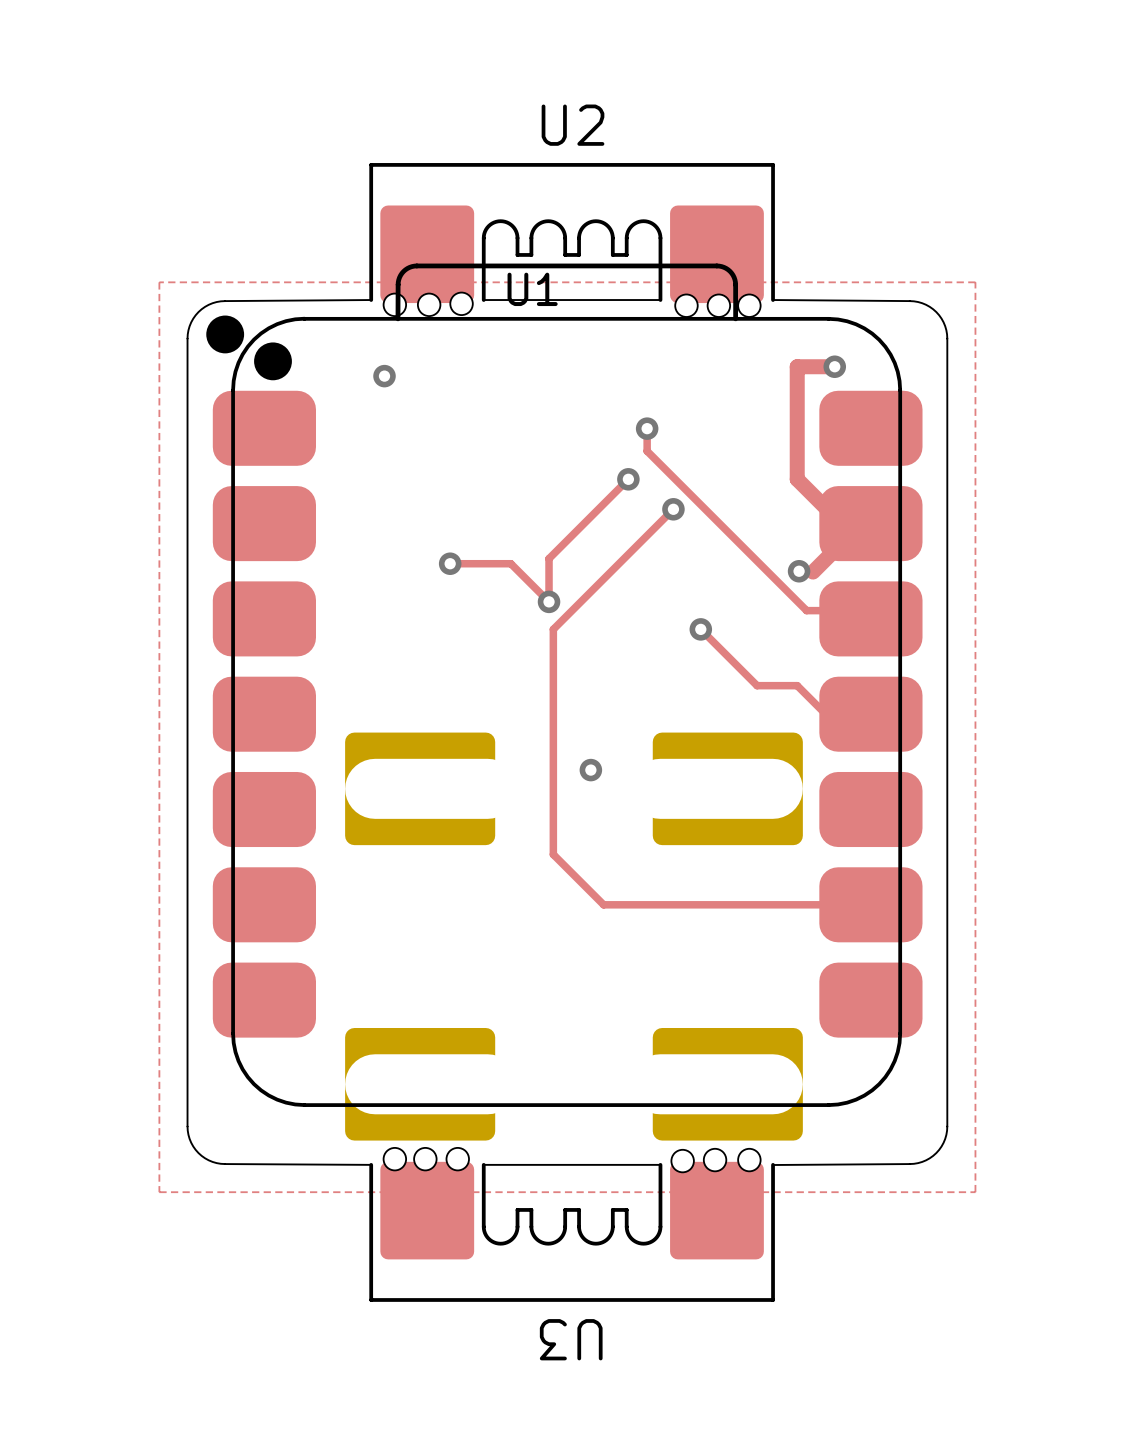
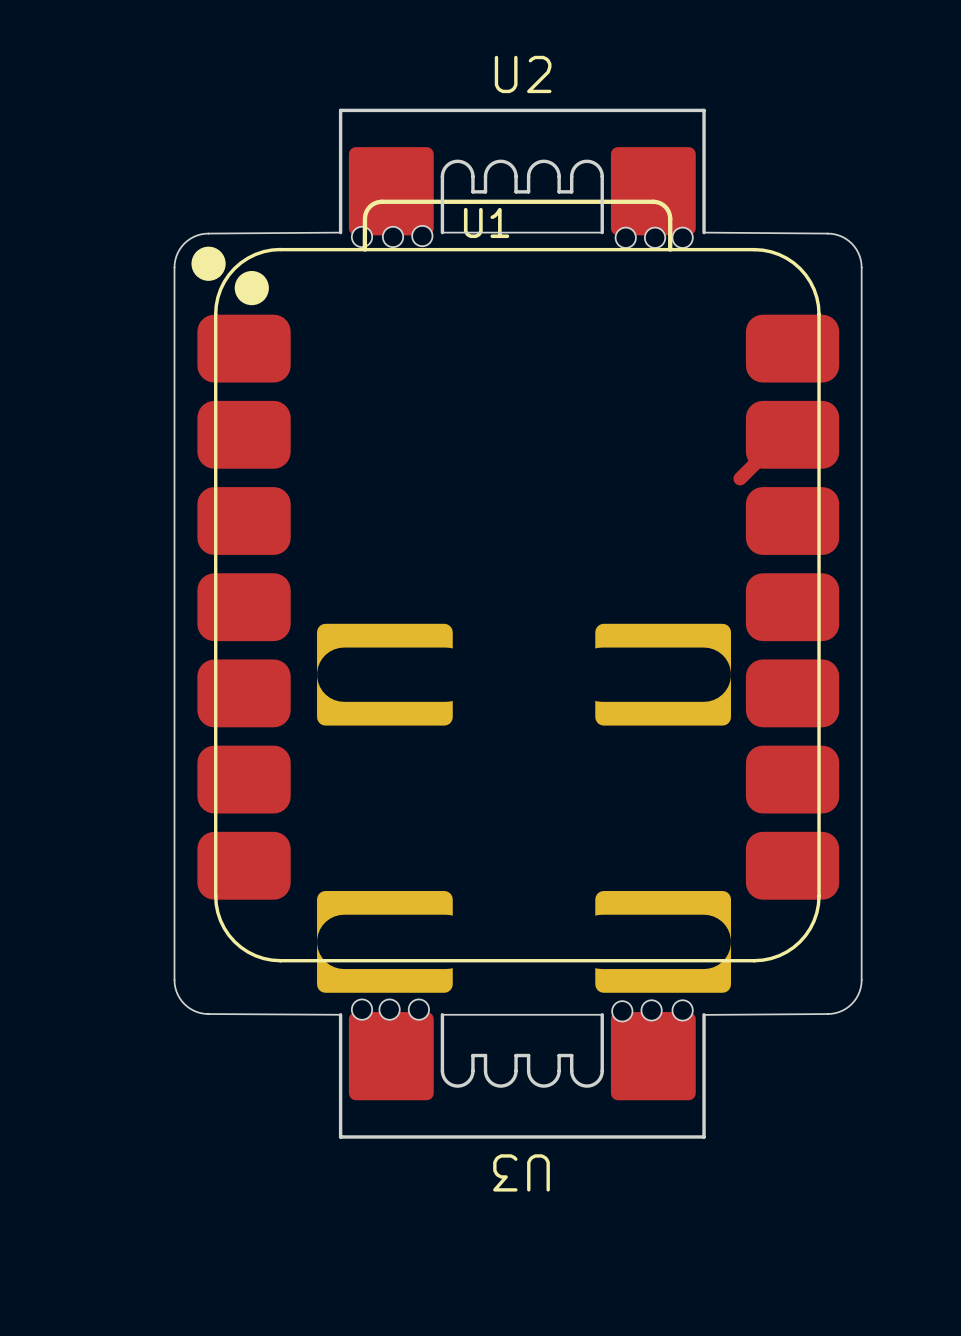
zone outline: (159, 282) (975, 282) (975, 1192) (159, 1192) (159, 282) -> none
track: (834, 366) (797, 366) (797, 479) (841, 523) (870, 523) -> none
via: (834, 366) -> none
via: (384, 376) -> none
track: (647, 428) (647, 451) (806, 610) (862, 610) (870, 618) -> none
via: (647, 428) -> none
track: (628, 479) (549, 558) (549, 601) (510, 563) (450, 563) -> none
via: (628, 479) -> none
track: (673, 509) (553, 629) (553, 854) (603, 904) (870, 904) -> none
via: (673, 509) -> none
via: (450, 563) -> none
via: (799, 571) -> none
via: (549, 601) -> none
track: (700, 629) (757, 685) (797, 685) (825, 714) (870, 714) -> none
via: (700, 629) -> none
via: (590, 770) -> none

